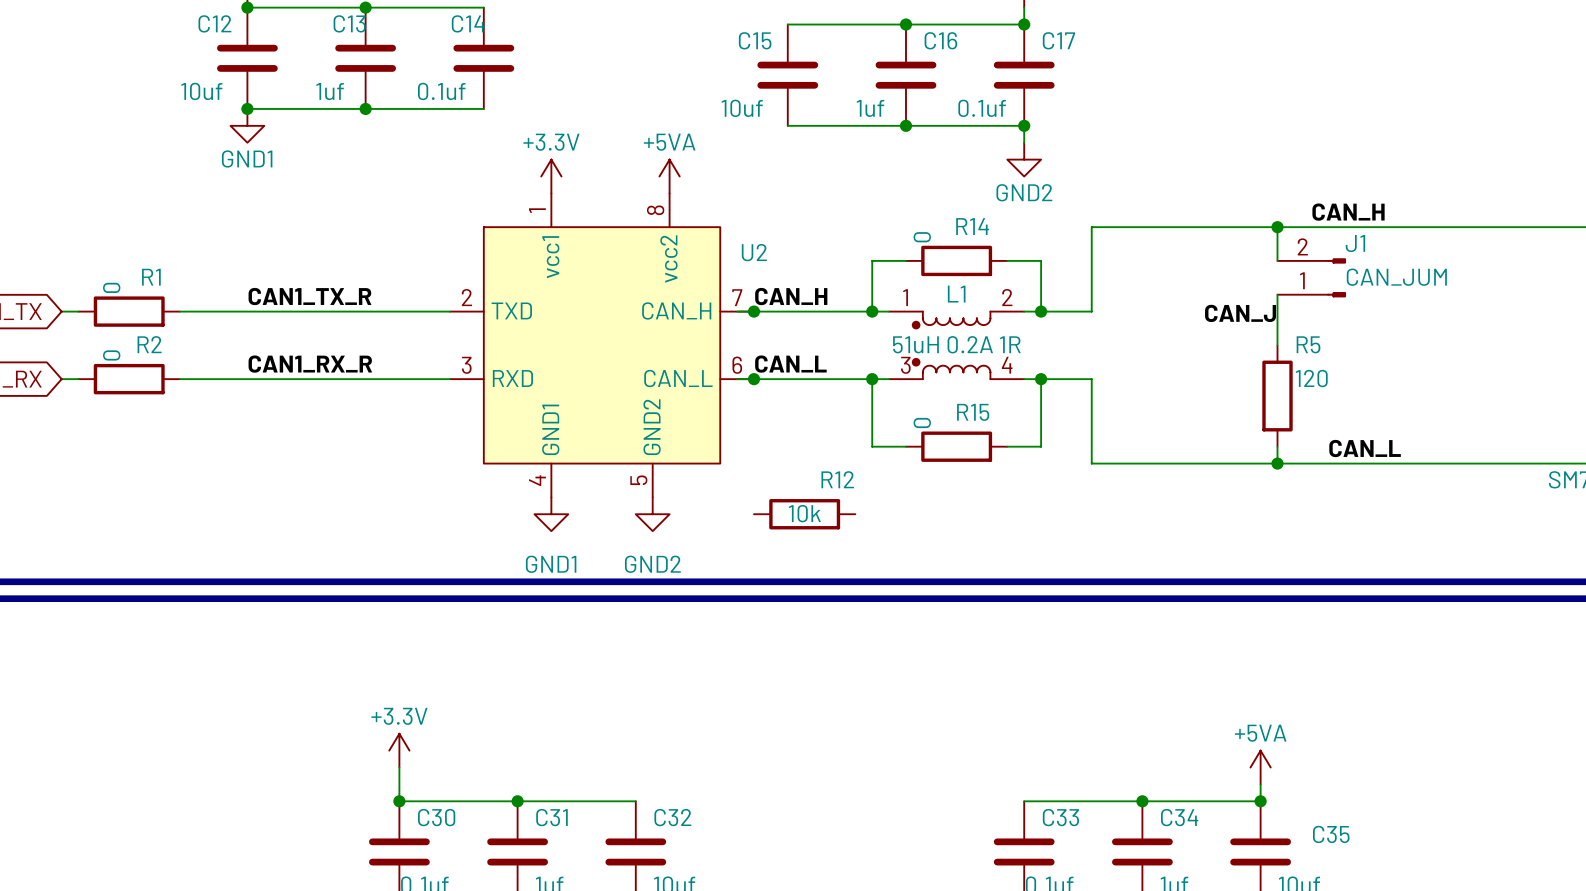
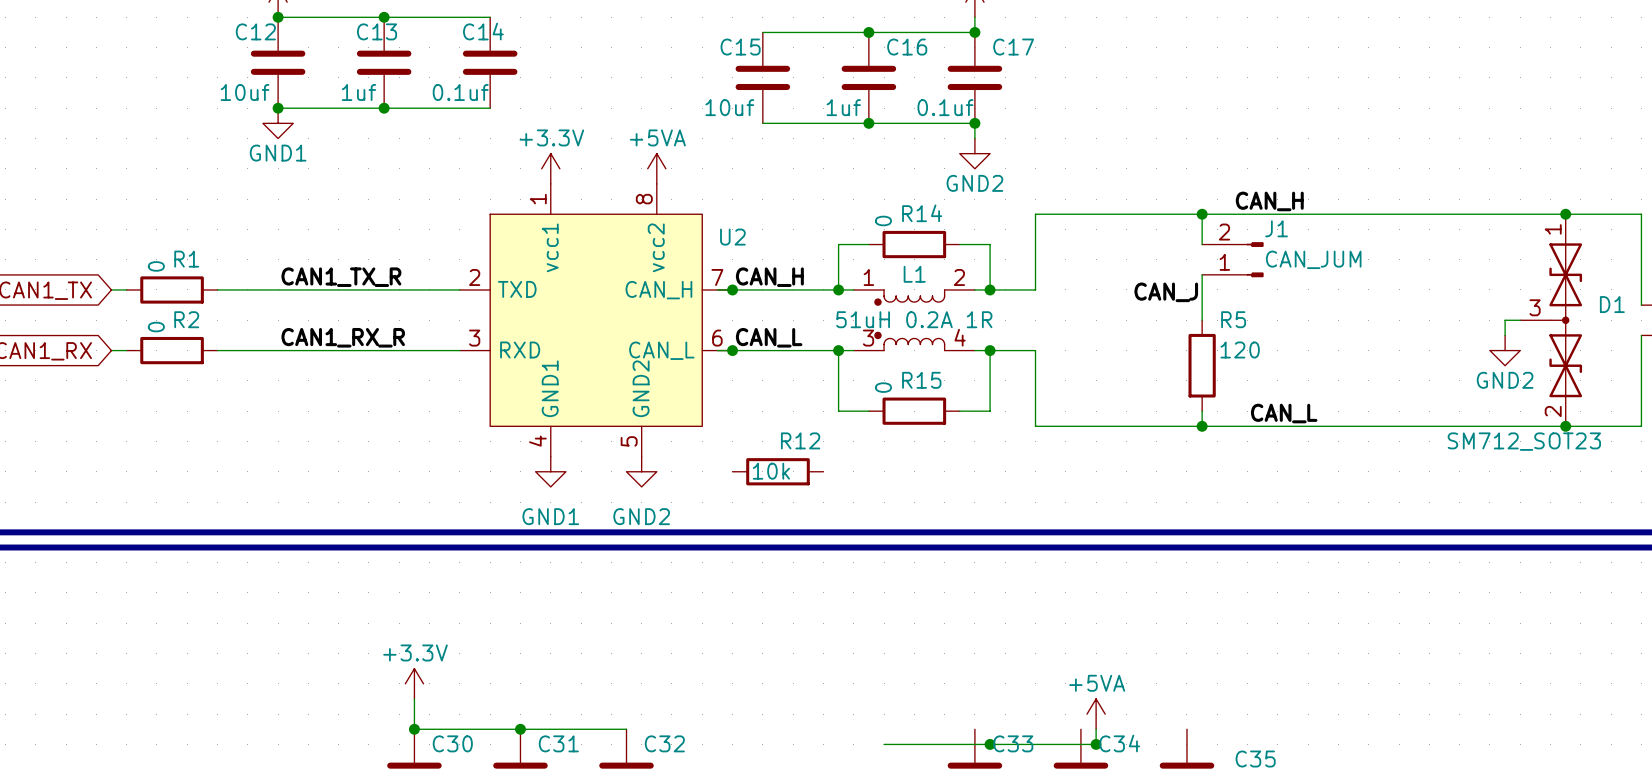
power symbol position: +5VA (1260, 767) -> +5VA (1096, 714)
wire: (1260, 784) (1260, 801) (1024, 801) -> (1096, 729) (1096, 744) (884, 744)
junction position: (1142, 801) -> (1096, 744)
junction: (1260, 801) -> none
junction: none -> (990, 744)

